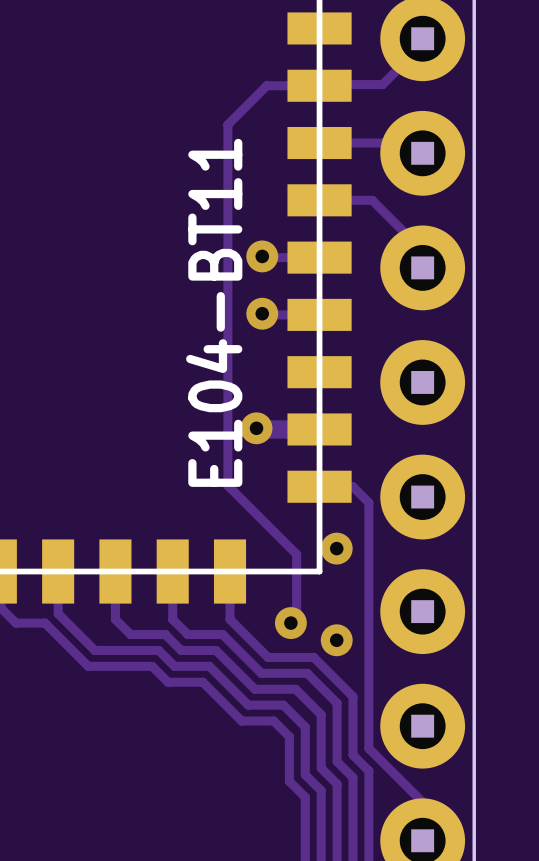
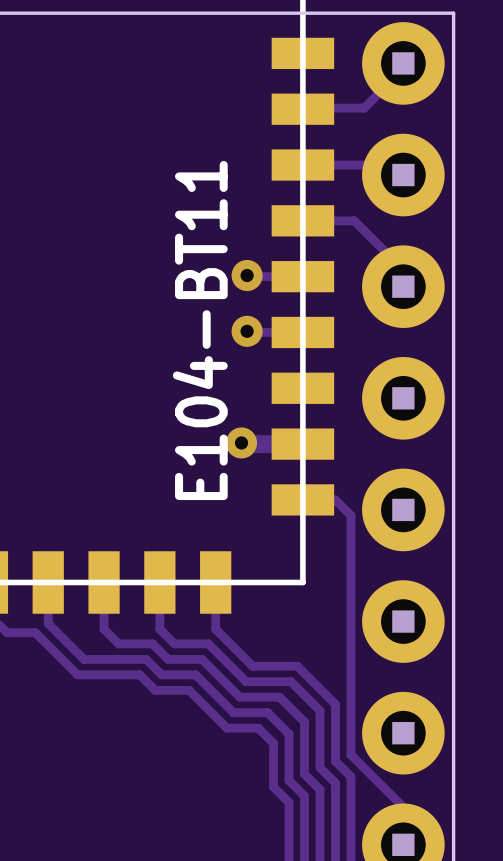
track: (319, 85) (266, 85) (227, 124) (227, 485) (296, 554) (296, 617) (290, 623) -> none
via: (336, 548) -> none
via: (290, 623) -> none
via: (336, 640) -> none

